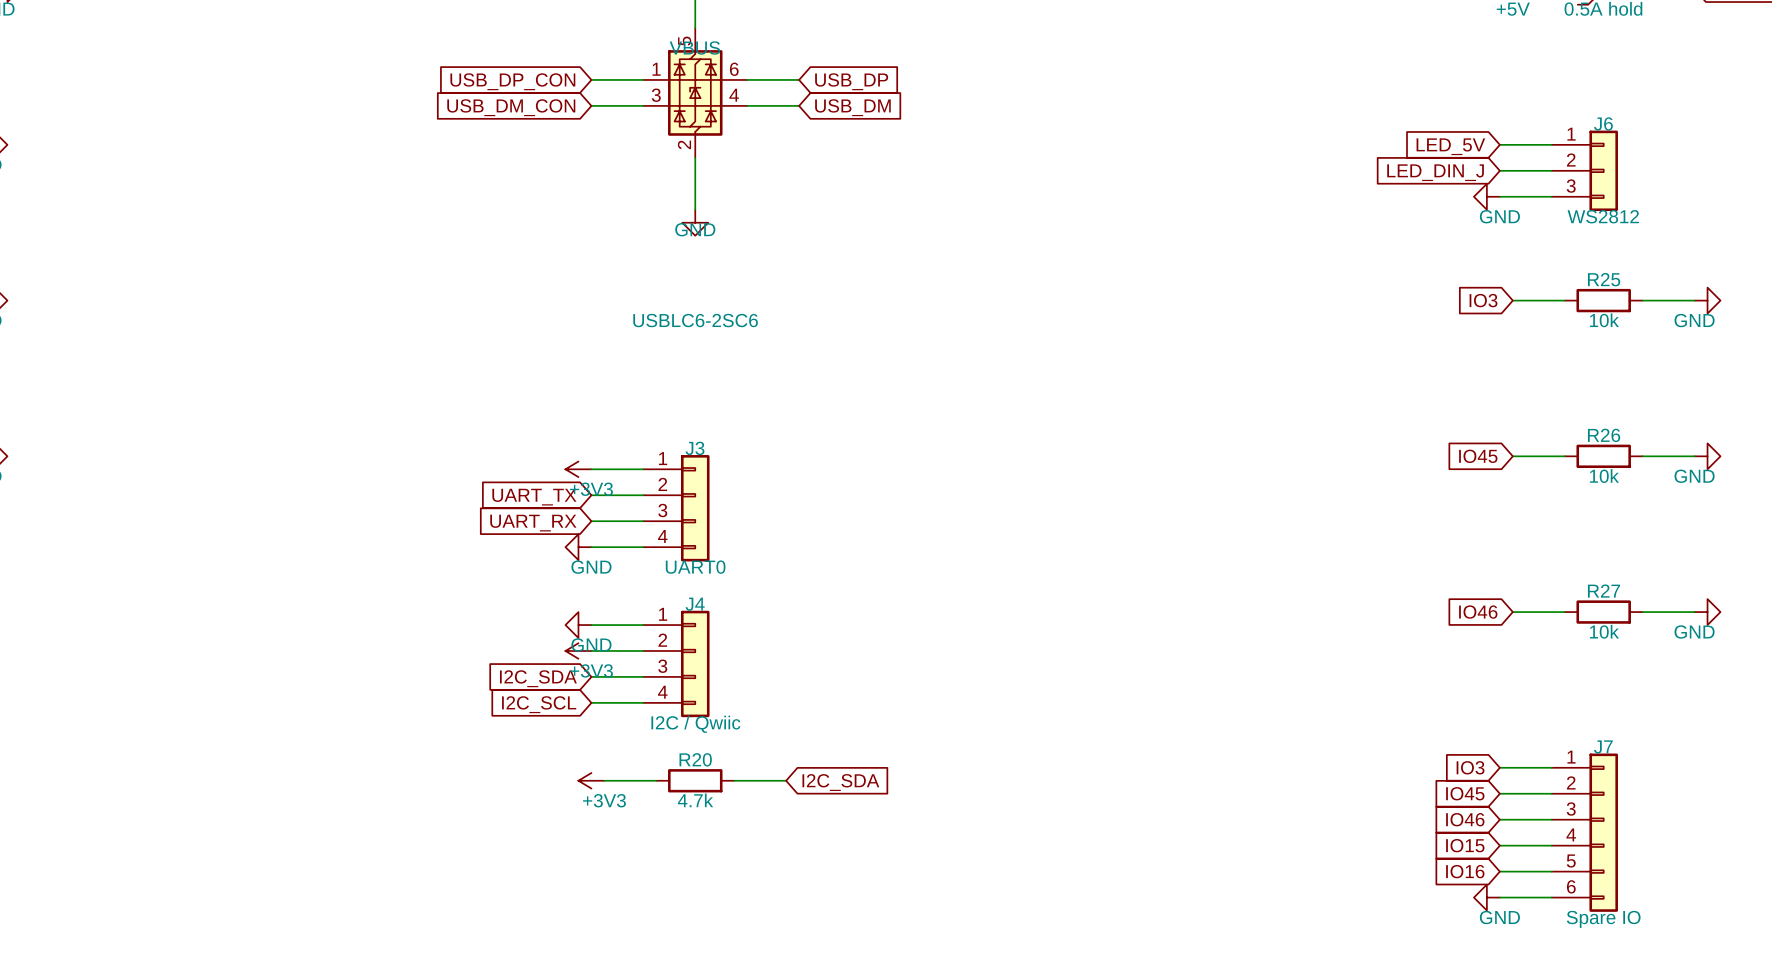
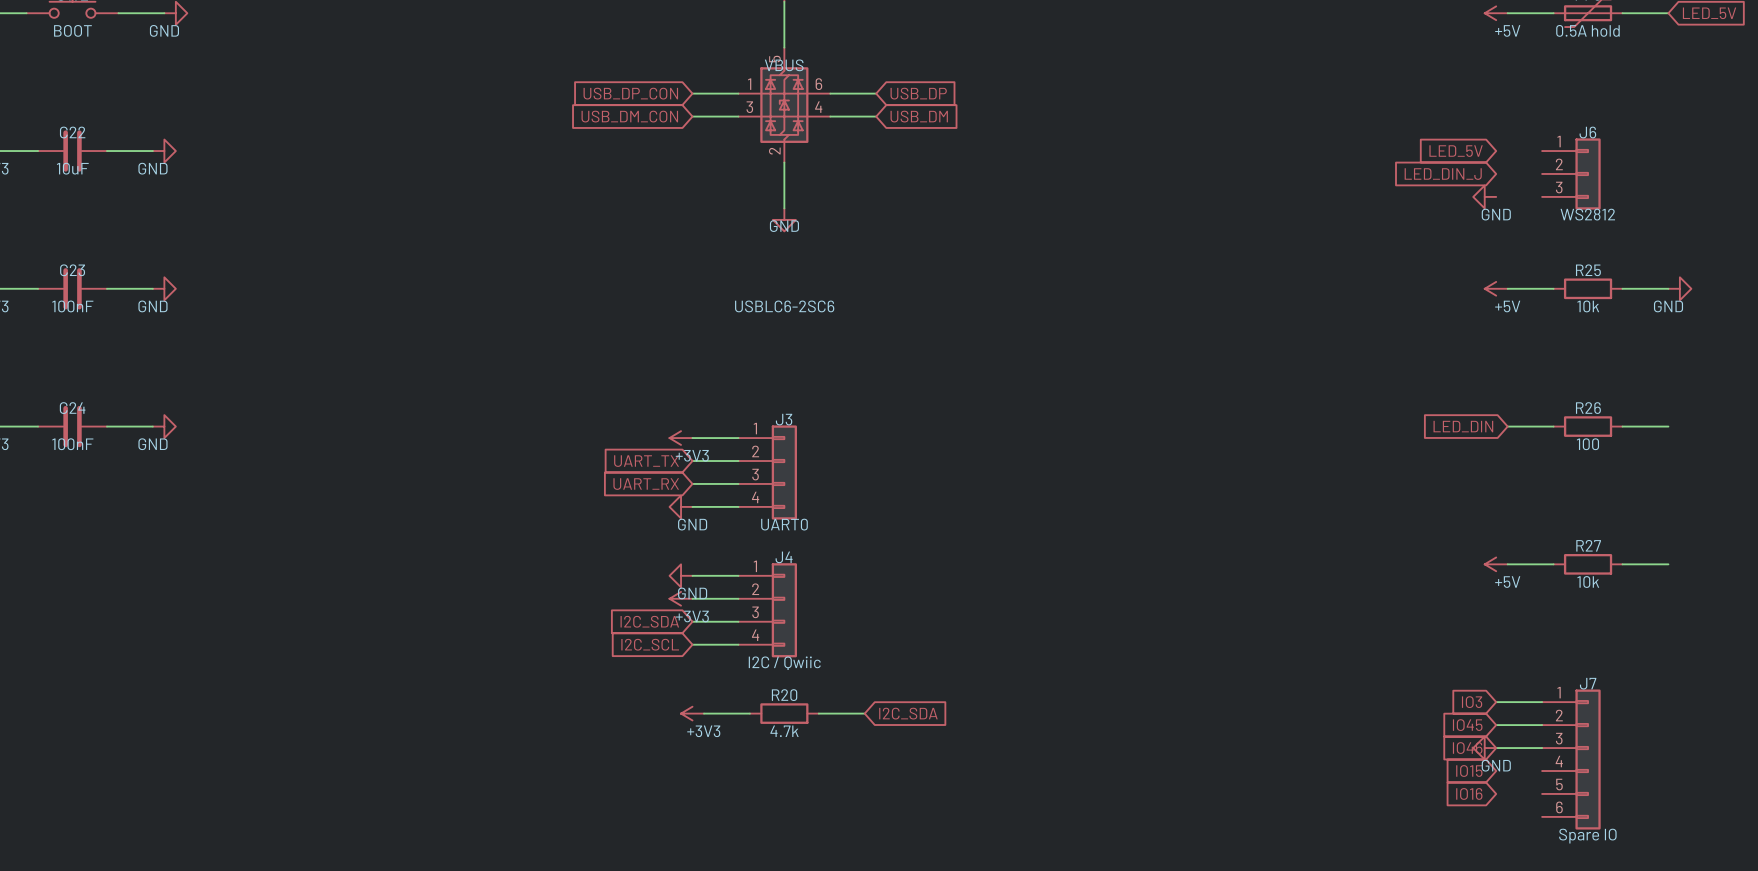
wire: (1499, 144) (1551, 144) -> none
wire: (1499, 170) (1551, 170) -> none
wire: (1499, 196) (1551, 196) -> none
global label: IO3 (1483, 300) -> none
power symbol: none -> +5V (1496, 288)
global label: IO45 (1478, 456) -> LED_DIN (1463, 426)
power symbol: GND (1707, 456) -> none
R26 value: 10k (1604, 476) -> 100 (1587, 444)
global label: IO46 (1478, 612) -> none
power symbol: none -> +5V (1496, 564)
power symbol: GND (1707, 612) -> none
wire: (1499, 845) (1551, 845) -> none
wire: (1499, 871) (1551, 871) -> none
power symbol position: GND (1486, 897) -> GND (1484, 748)
wire: (1499, 897) (1551, 897) -> none

